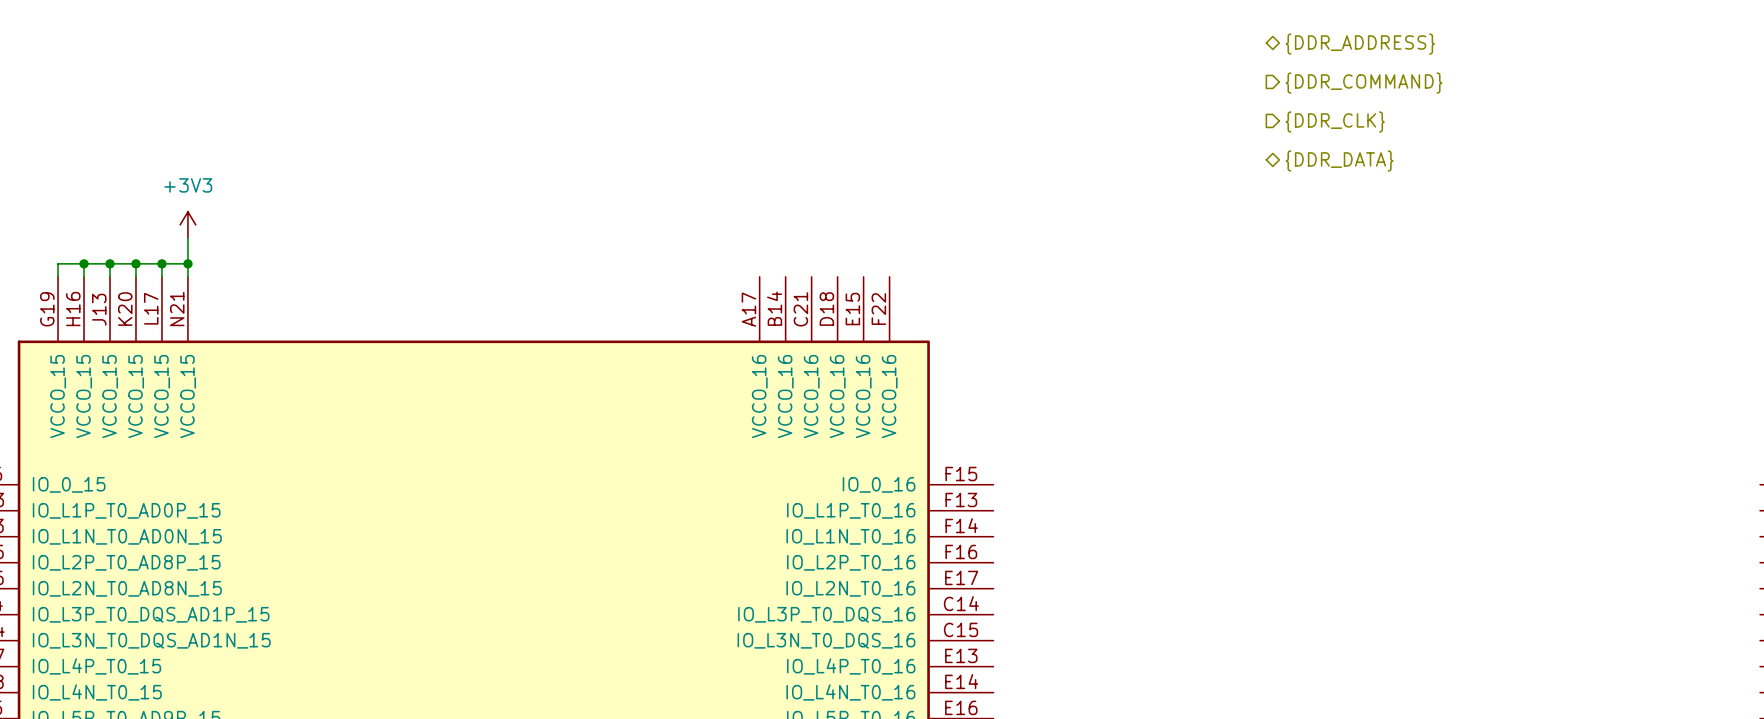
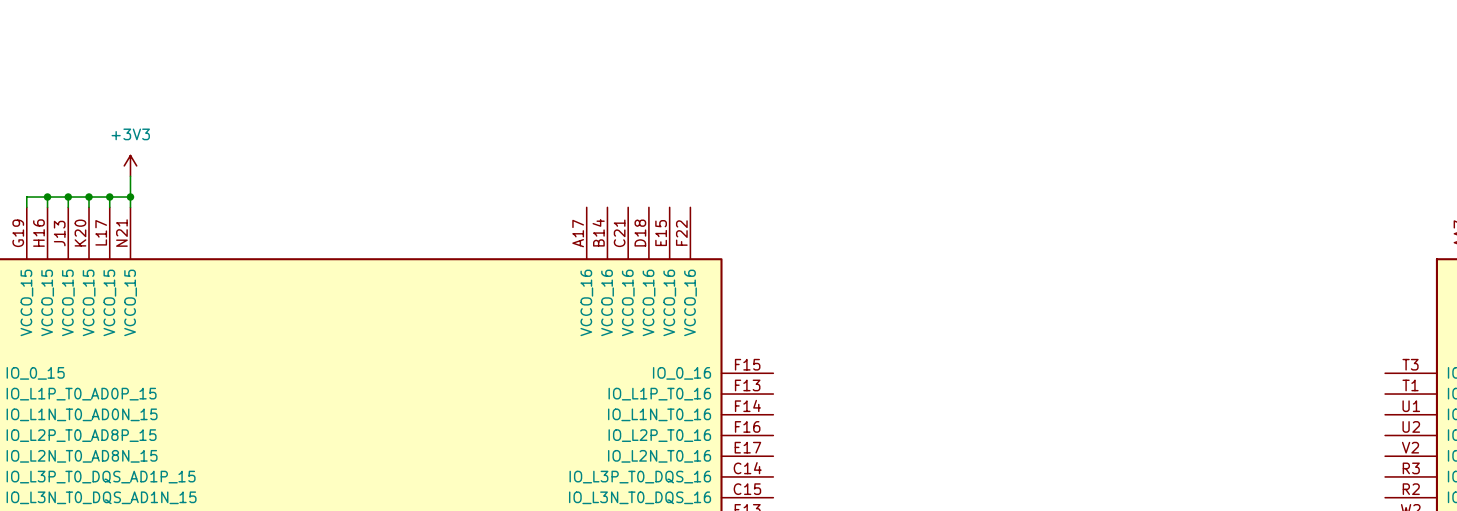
hierarchical label: {DDR_ADDRESS} (1360, 44) -> none
hierarchical label: {DDR_COMMAND} (1364, 83) -> none
hierarchical label: {DDR_CLK} (1335, 122) -> none
hierarchical label: {DDR_DATA} (1339, 160) -> none

